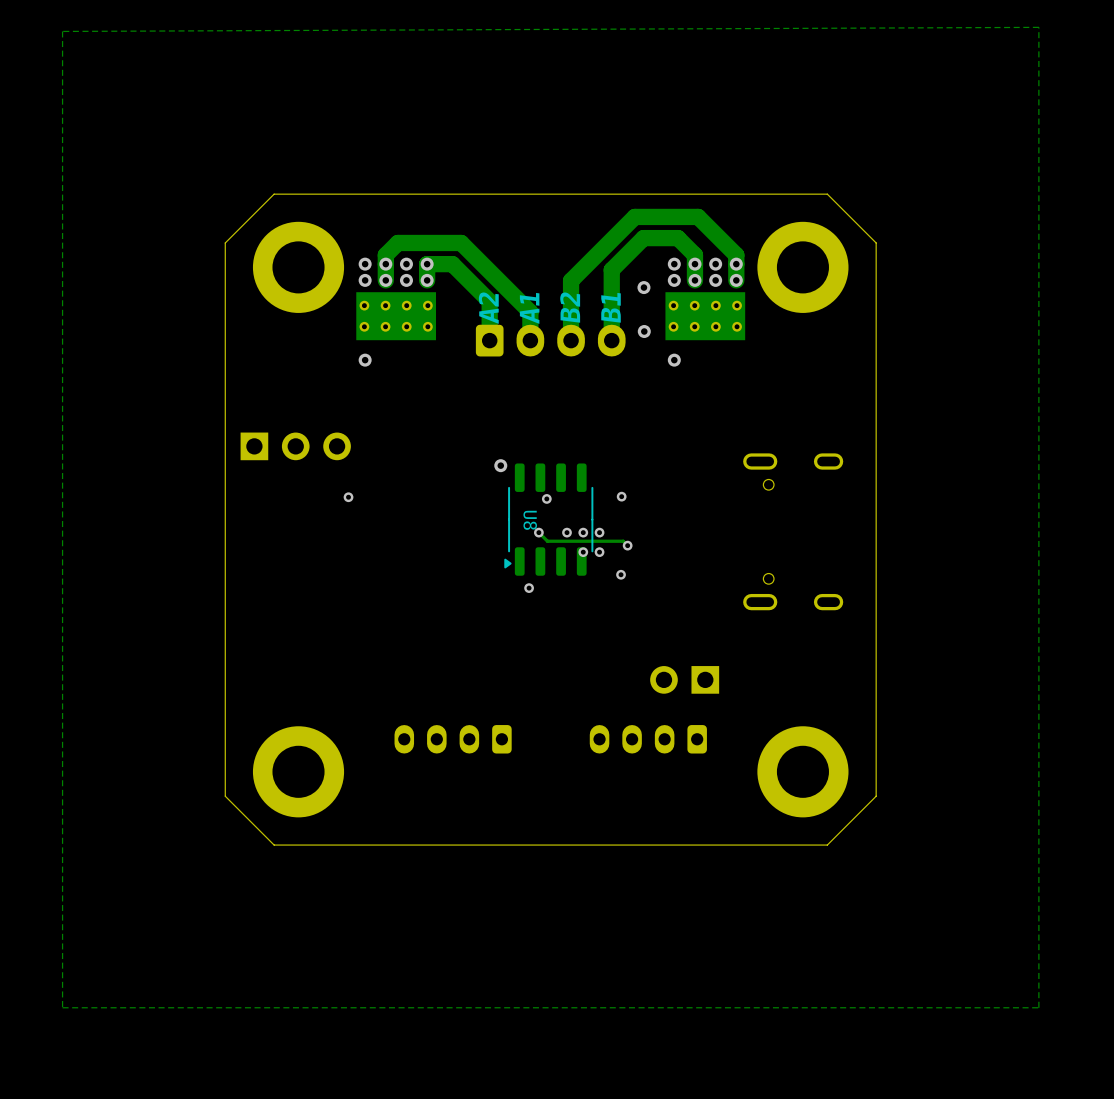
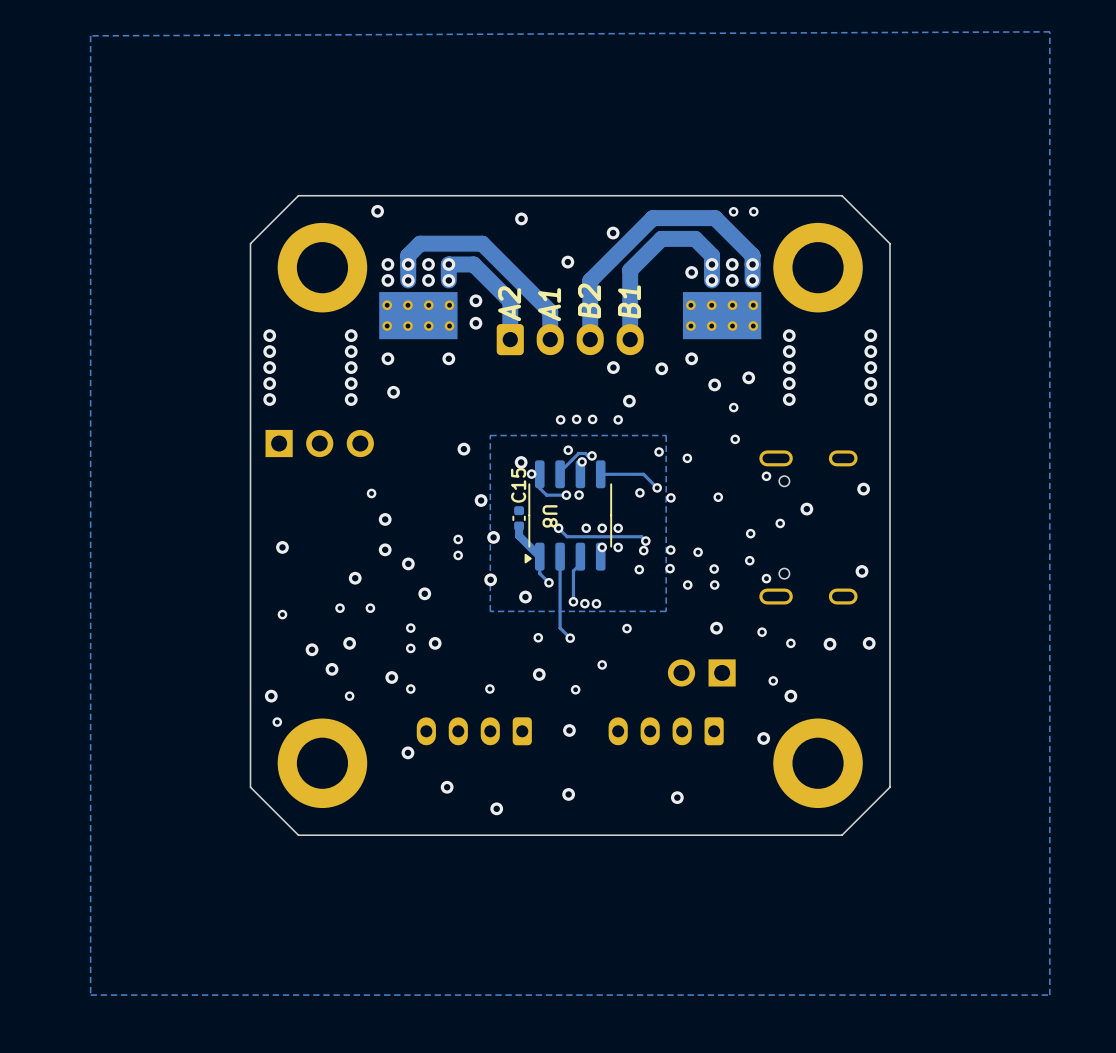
via: none -> (377, 211)
via: none -> (733, 211)
via: none -> (753, 211)
via: none -> (521, 218)
via: none -> (613, 233)
via: none -> (567, 262)
via: (674, 264) -> none
via: none -> (691, 272)
via: (674, 280) -> none
via: (643, 287) -> none
via: none -> (475, 300)
via: none -> (475, 323)
via: (644, 331) -> none
via: none -> (269, 335)
via: none -> (351, 335)
via: none -> (789, 335)
via: none -> (870, 335)
via: none -> (269, 351)
via: none -> (351, 351)
via: none -> (789, 351)
via: none -> (870, 351)
via: none -> (448, 358)
via: none -> (269, 367)
via: none -> (351, 367)
via: none -> (613, 367)
via: none -> (789, 367)
via: none -> (870, 367)
via: none -> (661, 368)
via: none -> (748, 377)
via: none -> (269, 383)
via: none -> (351, 383)
via: none -> (789, 383)
via: none -> (870, 383)
via: none -> (714, 384)
via: none -> (393, 392)
via: none -> (269, 399)
via: none -> (351, 399)
via: none -> (789, 399)
via: none -> (870, 399)
via: none -> (629, 401)
via: none -> (733, 407)
via: none -> (576, 419)
via: none -> (592, 419)
via: none -> (560, 419)
via: none -> (618, 419)
zone outline: none -> (666, 435) (490, 435) (490, 611) (666, 611) (666, 435)
via: none -> (735, 439)
via: none -> (463, 449)
via: none -> (568, 450)
via: none -> (659, 452)
track: none -> (592, 455) (578, 453) (560, 474)
via: none -> (592, 455)
via: none -> (687, 458)
via: none -> (582, 461)
track: none -> (531, 474) (539, 474) (539, 488) (546, 495) (566, 495)
via: none -> (531, 474)
track: none -> (600, 474) (643, 474) (657, 487)
via: none -> (766, 476)
via: none -> (657, 487)
via: none -> (863, 489)
via: none -> (579, 495)
via: none -> (670, 497)
via: none -> (718, 497)
via: none -> (481, 500)
via: none -> (806, 509)
C15: none -> (519, 518)
via: none -> (385, 519)
via: none -> (780, 523)
track: none -> (519, 526) (519, 535) (539, 556) (539, 573) (548, 582)
via: none -> (750, 533)
via: none -> (493, 537)
via: none -> (458, 539)
via: none -> (282, 547)
via: none -> (385, 549)
via: none -> (670, 550)
via: none -> (643, 550)
via: none -> (698, 552)
via: none -> (458, 555)
track: none -> (560, 556) (560, 628) (570, 638)
track: none -> (580, 556) (580, 564) (573, 571) (573, 601)
via: none -> (749, 560)
via: none -> (408, 563)
via: none -> (670, 568)
via: none -> (714, 569)
via: none -> (862, 571)
via: none -> (355, 578)
via: none -> (766, 578)
via: none -> (490, 579)
via: none -> (687, 585)
via: none -> (714, 585)
via: none -> (424, 593)
via: none -> (525, 597)
via: none -> (573, 601)
via: none -> (584, 603)
via: none -> (596, 603)
via: none -> (340, 608)
via: none -> (370, 608)
via: none -> (282, 614)
via: none -> (410, 628)
via: none -> (626, 628)
via: none -> (716, 628)
via: none -> (762, 632)
via: none -> (538, 637)
via: none -> (570, 638)
via: none -> (349, 643)
via: none -> (435, 643)
via: none -> (790, 643)
via: none -> (869, 643)
via: none -> (830, 644)
via: none -> (410, 648)
via: none -> (312, 649)
via: none -> (602, 664)
via: none -> (332, 669)
via: none -> (539, 674)
via: none -> (391, 677)
via: none -> (773, 680)
via: none -> (410, 689)
via: none -> (489, 689)
via: none -> (575, 689)
via: none -> (271, 696)
via: none -> (349, 696)
via: none -> (790, 696)
via: none -> (277, 722)
via: none -> (569, 730)
via: none -> (763, 738)
via: none -> (407, 752)
via: none -> (447, 787)
via: none -> (568, 794)
via: none -> (677, 797)
via: none -> (496, 808)

